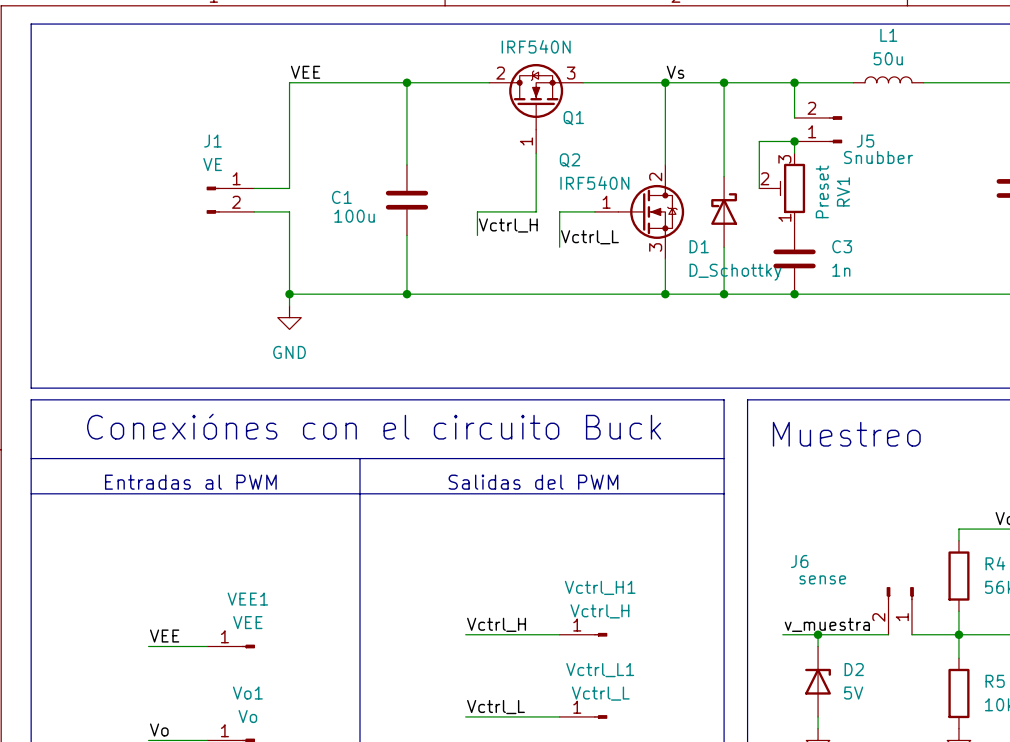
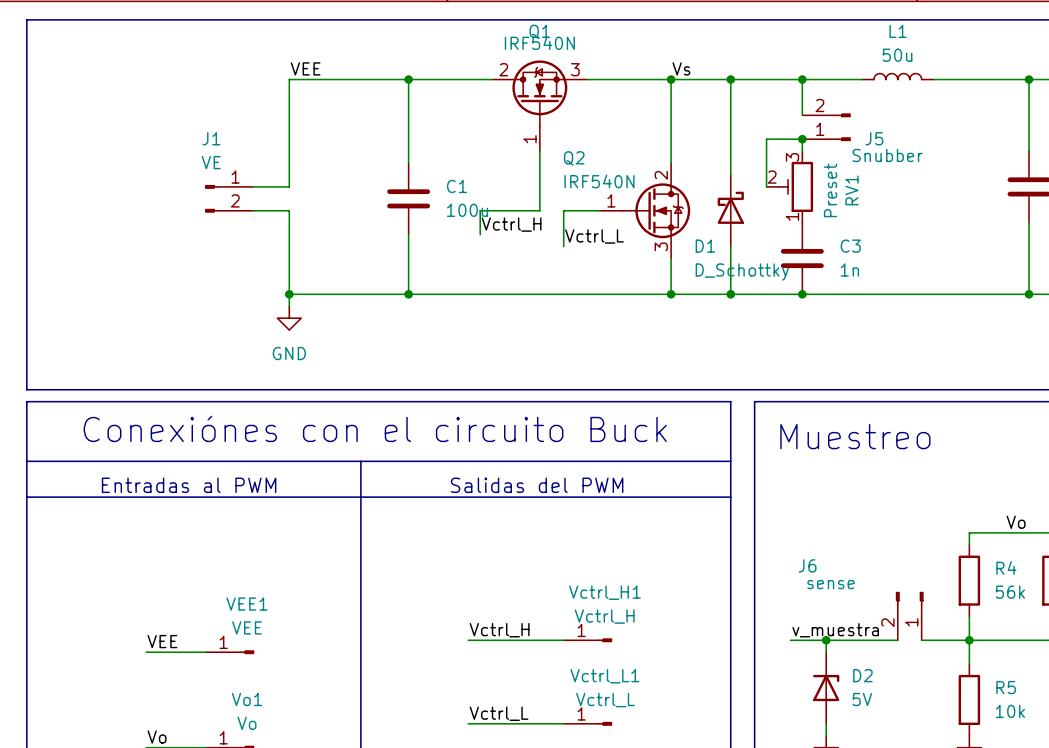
Q1 name position: Q1 (573, 118) -> Q1 (539, 31)
C1 name position: C1 (341, 197) -> C1 (457, 186)
C1 value position: 100u (354, 216) -> 100u (467, 210)

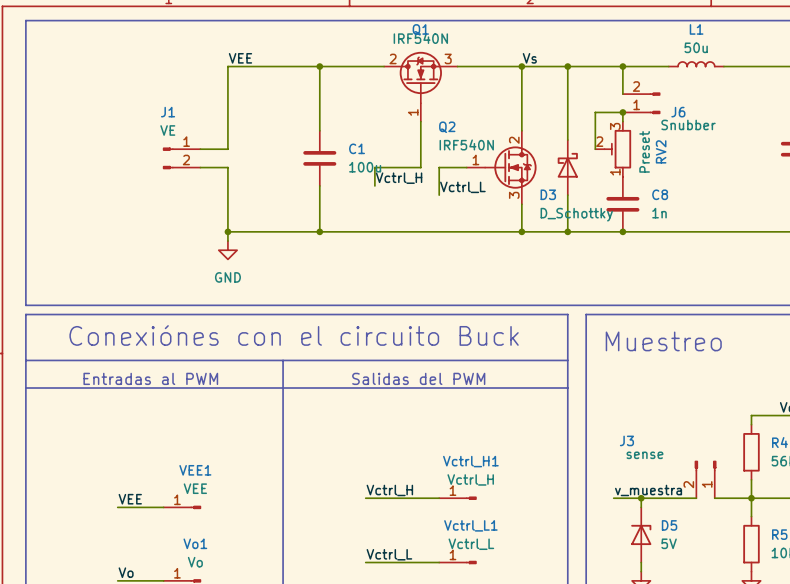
J5 name: J5 (874, 138) -> J6 (678, 112)
RV1 name: RV1 (852, 190) -> RV2 (661, 151)
D1 name: D1 (705, 246) -> D3 (548, 194)
C3 name: C3 (850, 246) -> C8 (660, 194)
J6 name: J6 (807, 565) -> J3 (626, 440)
D2 name: D2 (862, 675) -> D5 (669, 525)

